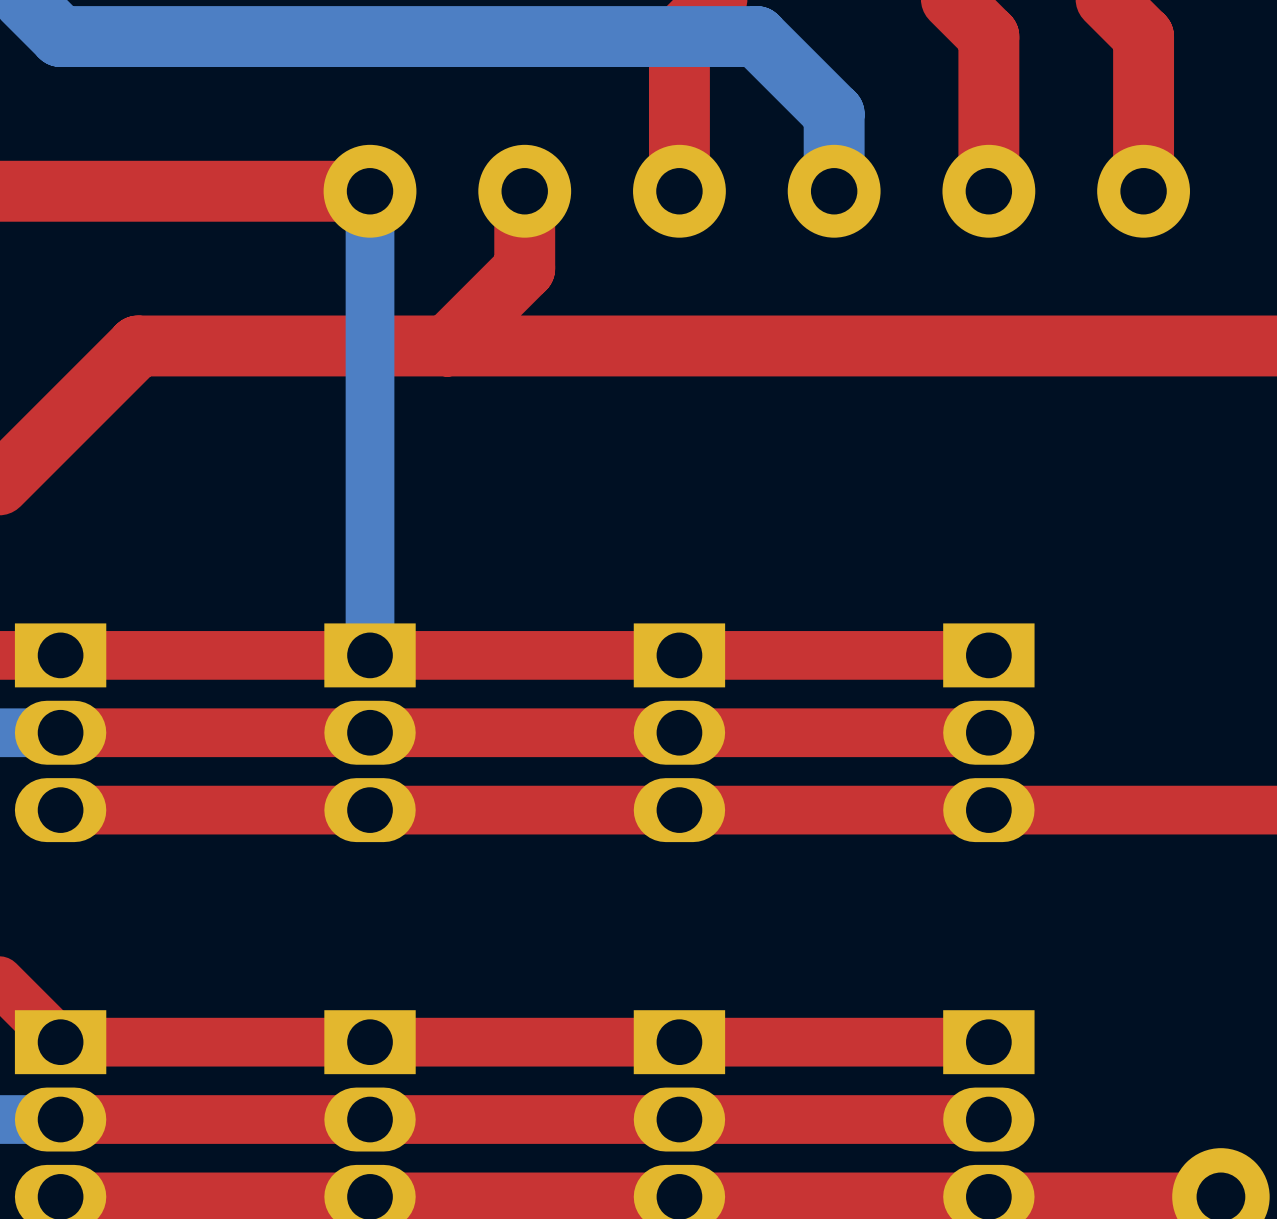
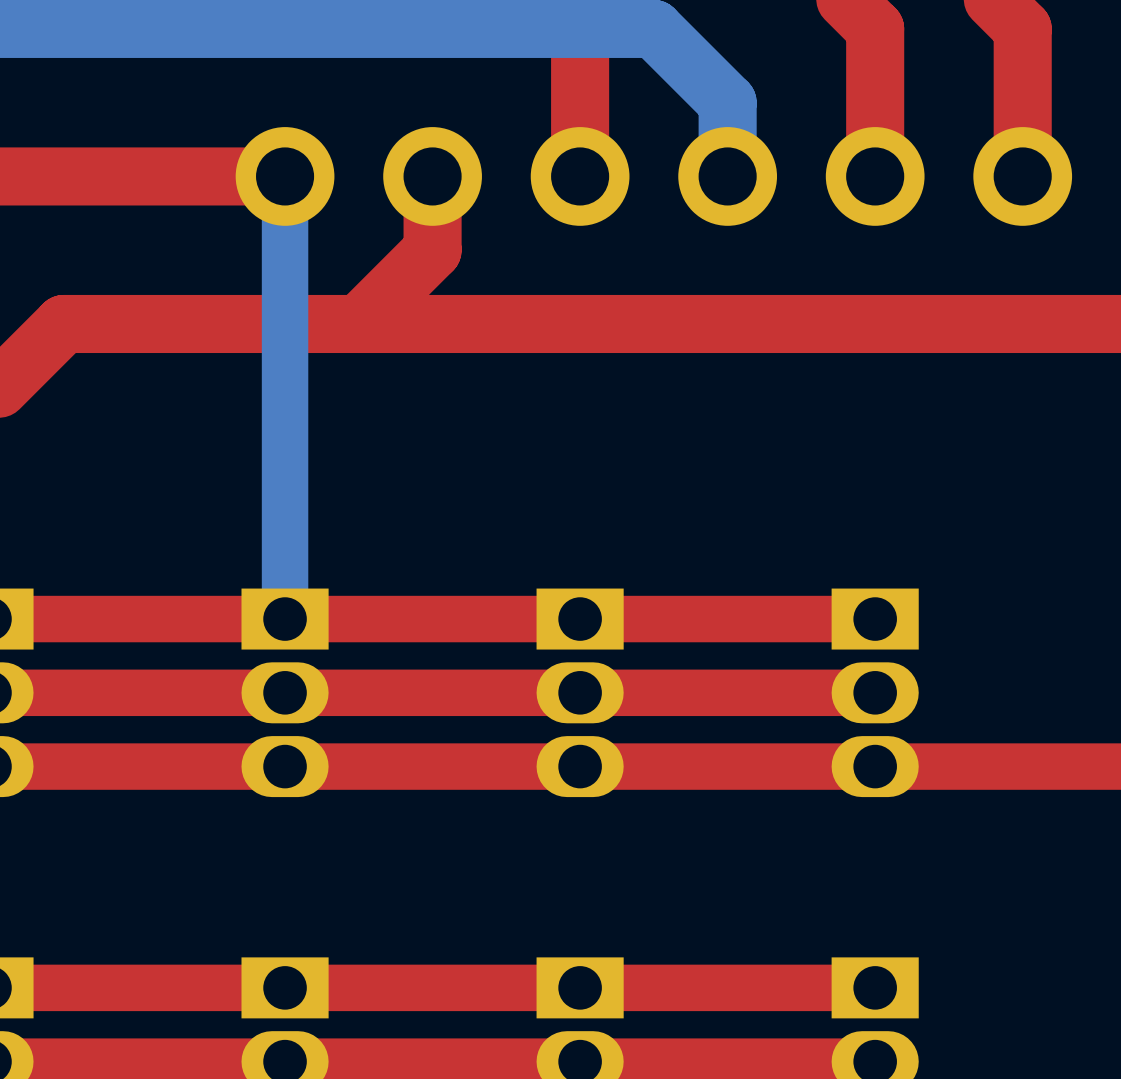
part footprint: [323, 144, 1190, 238] -> [235, 127, 1073, 226]

